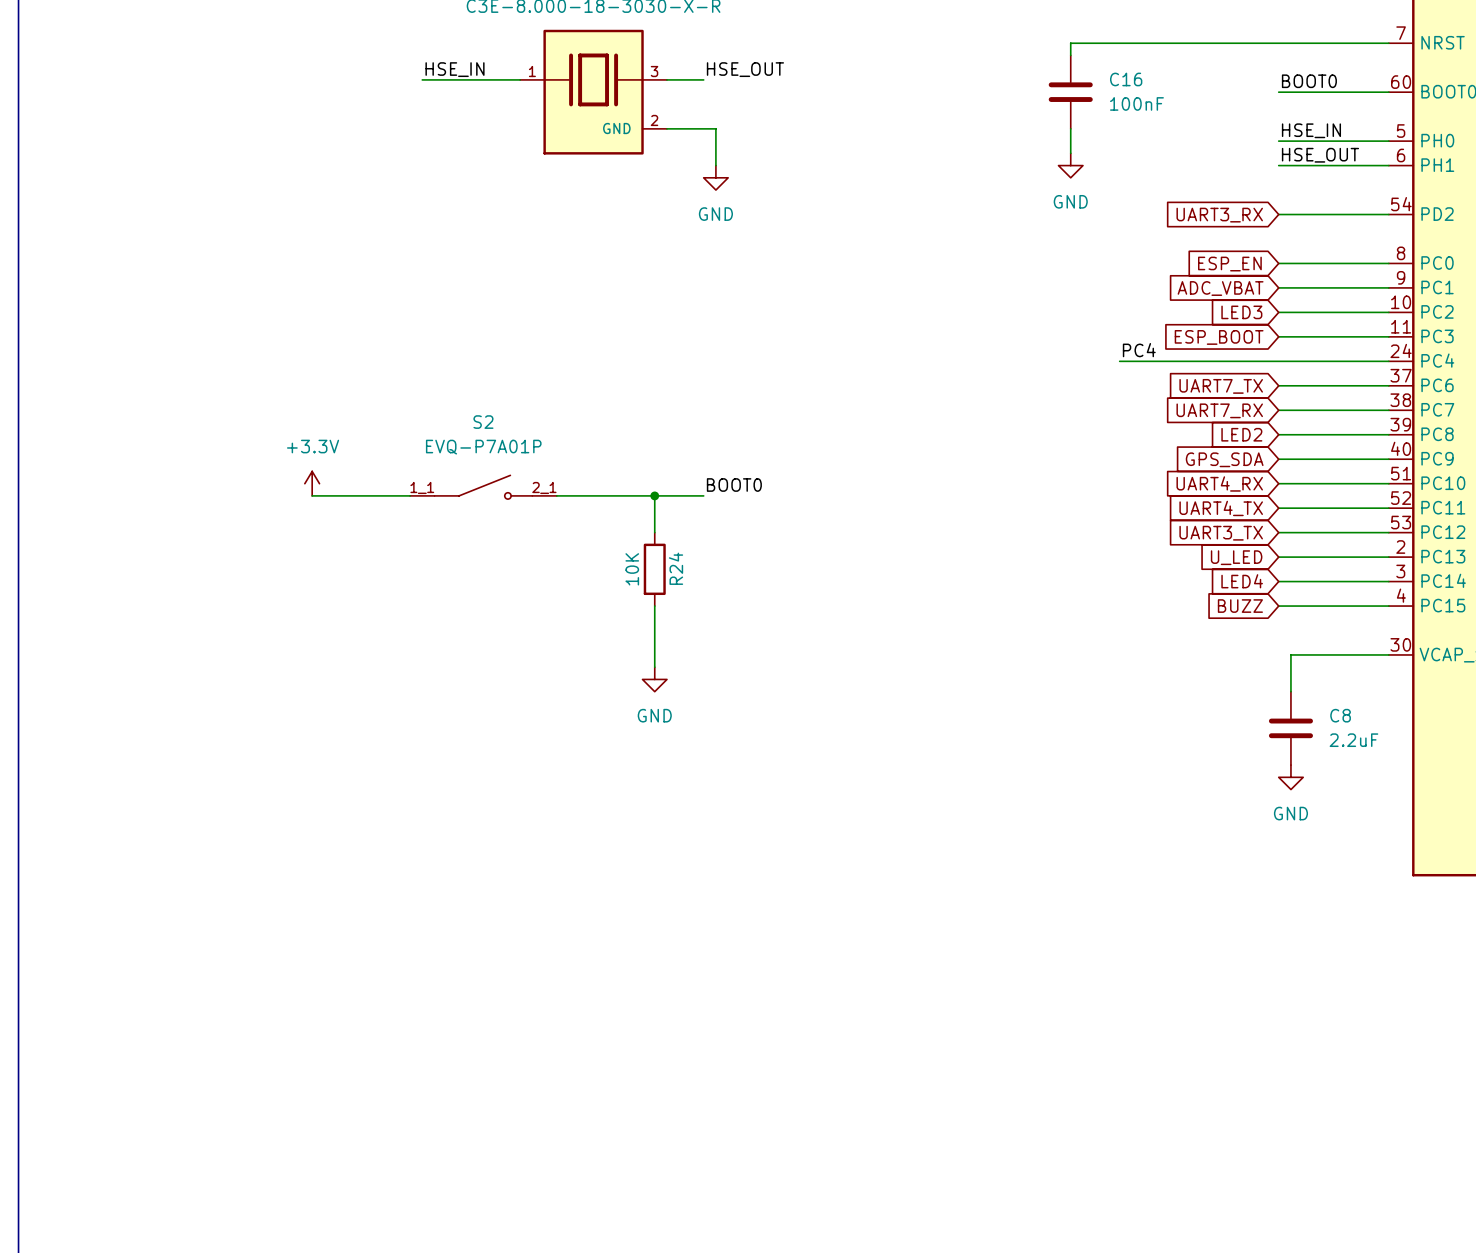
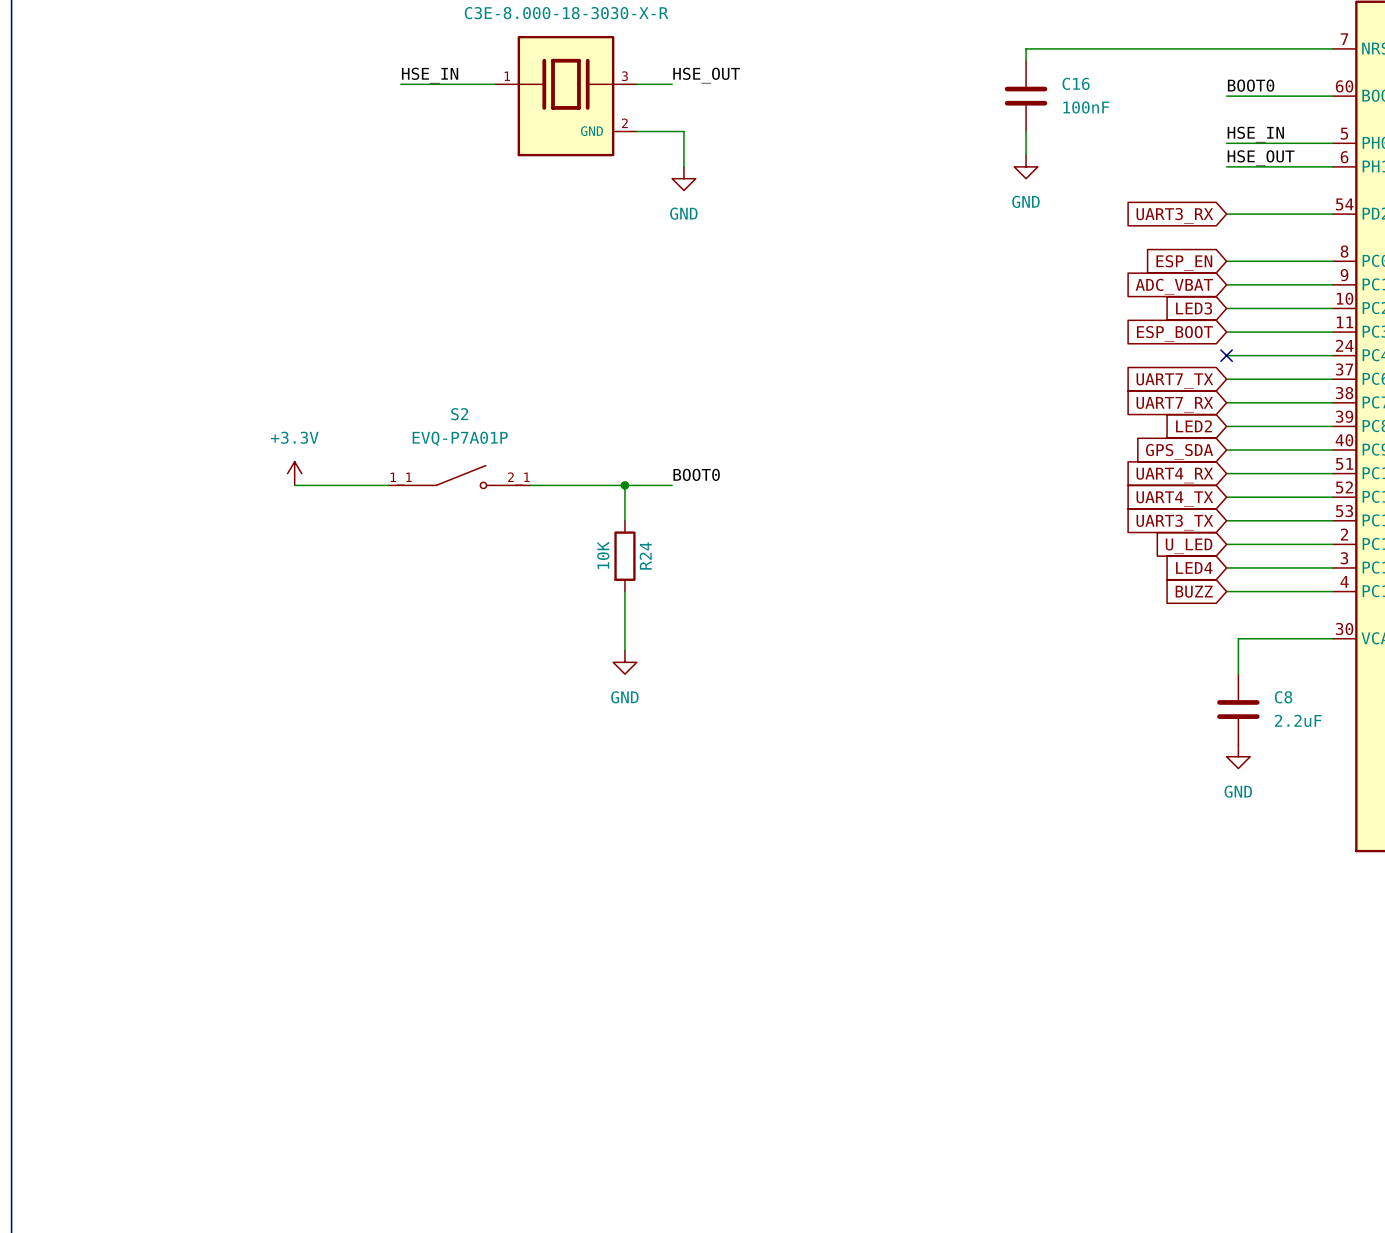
label: PC4 (1139, 350) -> none
wire: (1119, 361) (1278, 361) -> none
no-connect mark: none -> (1226, 355)

